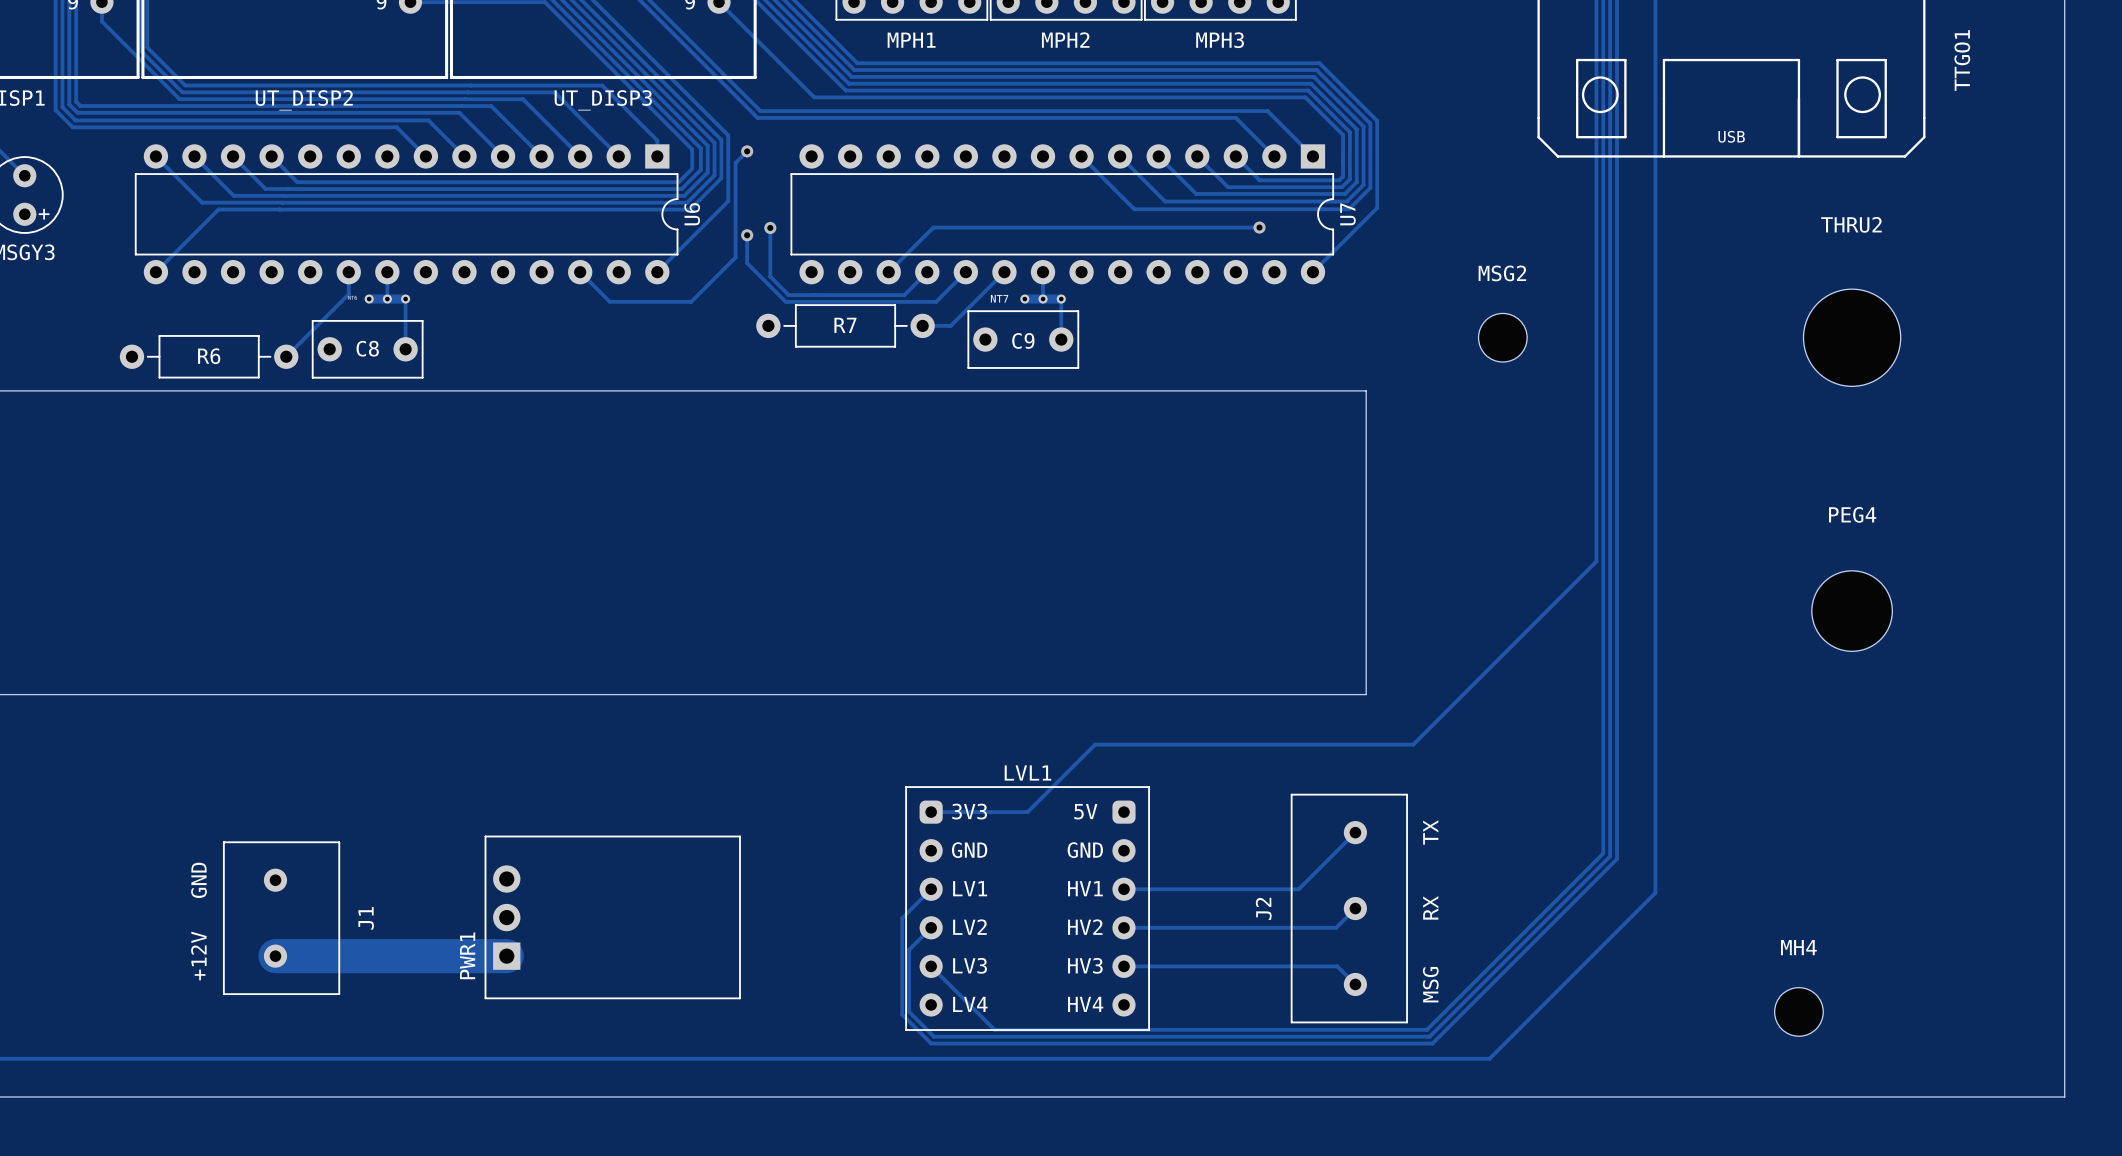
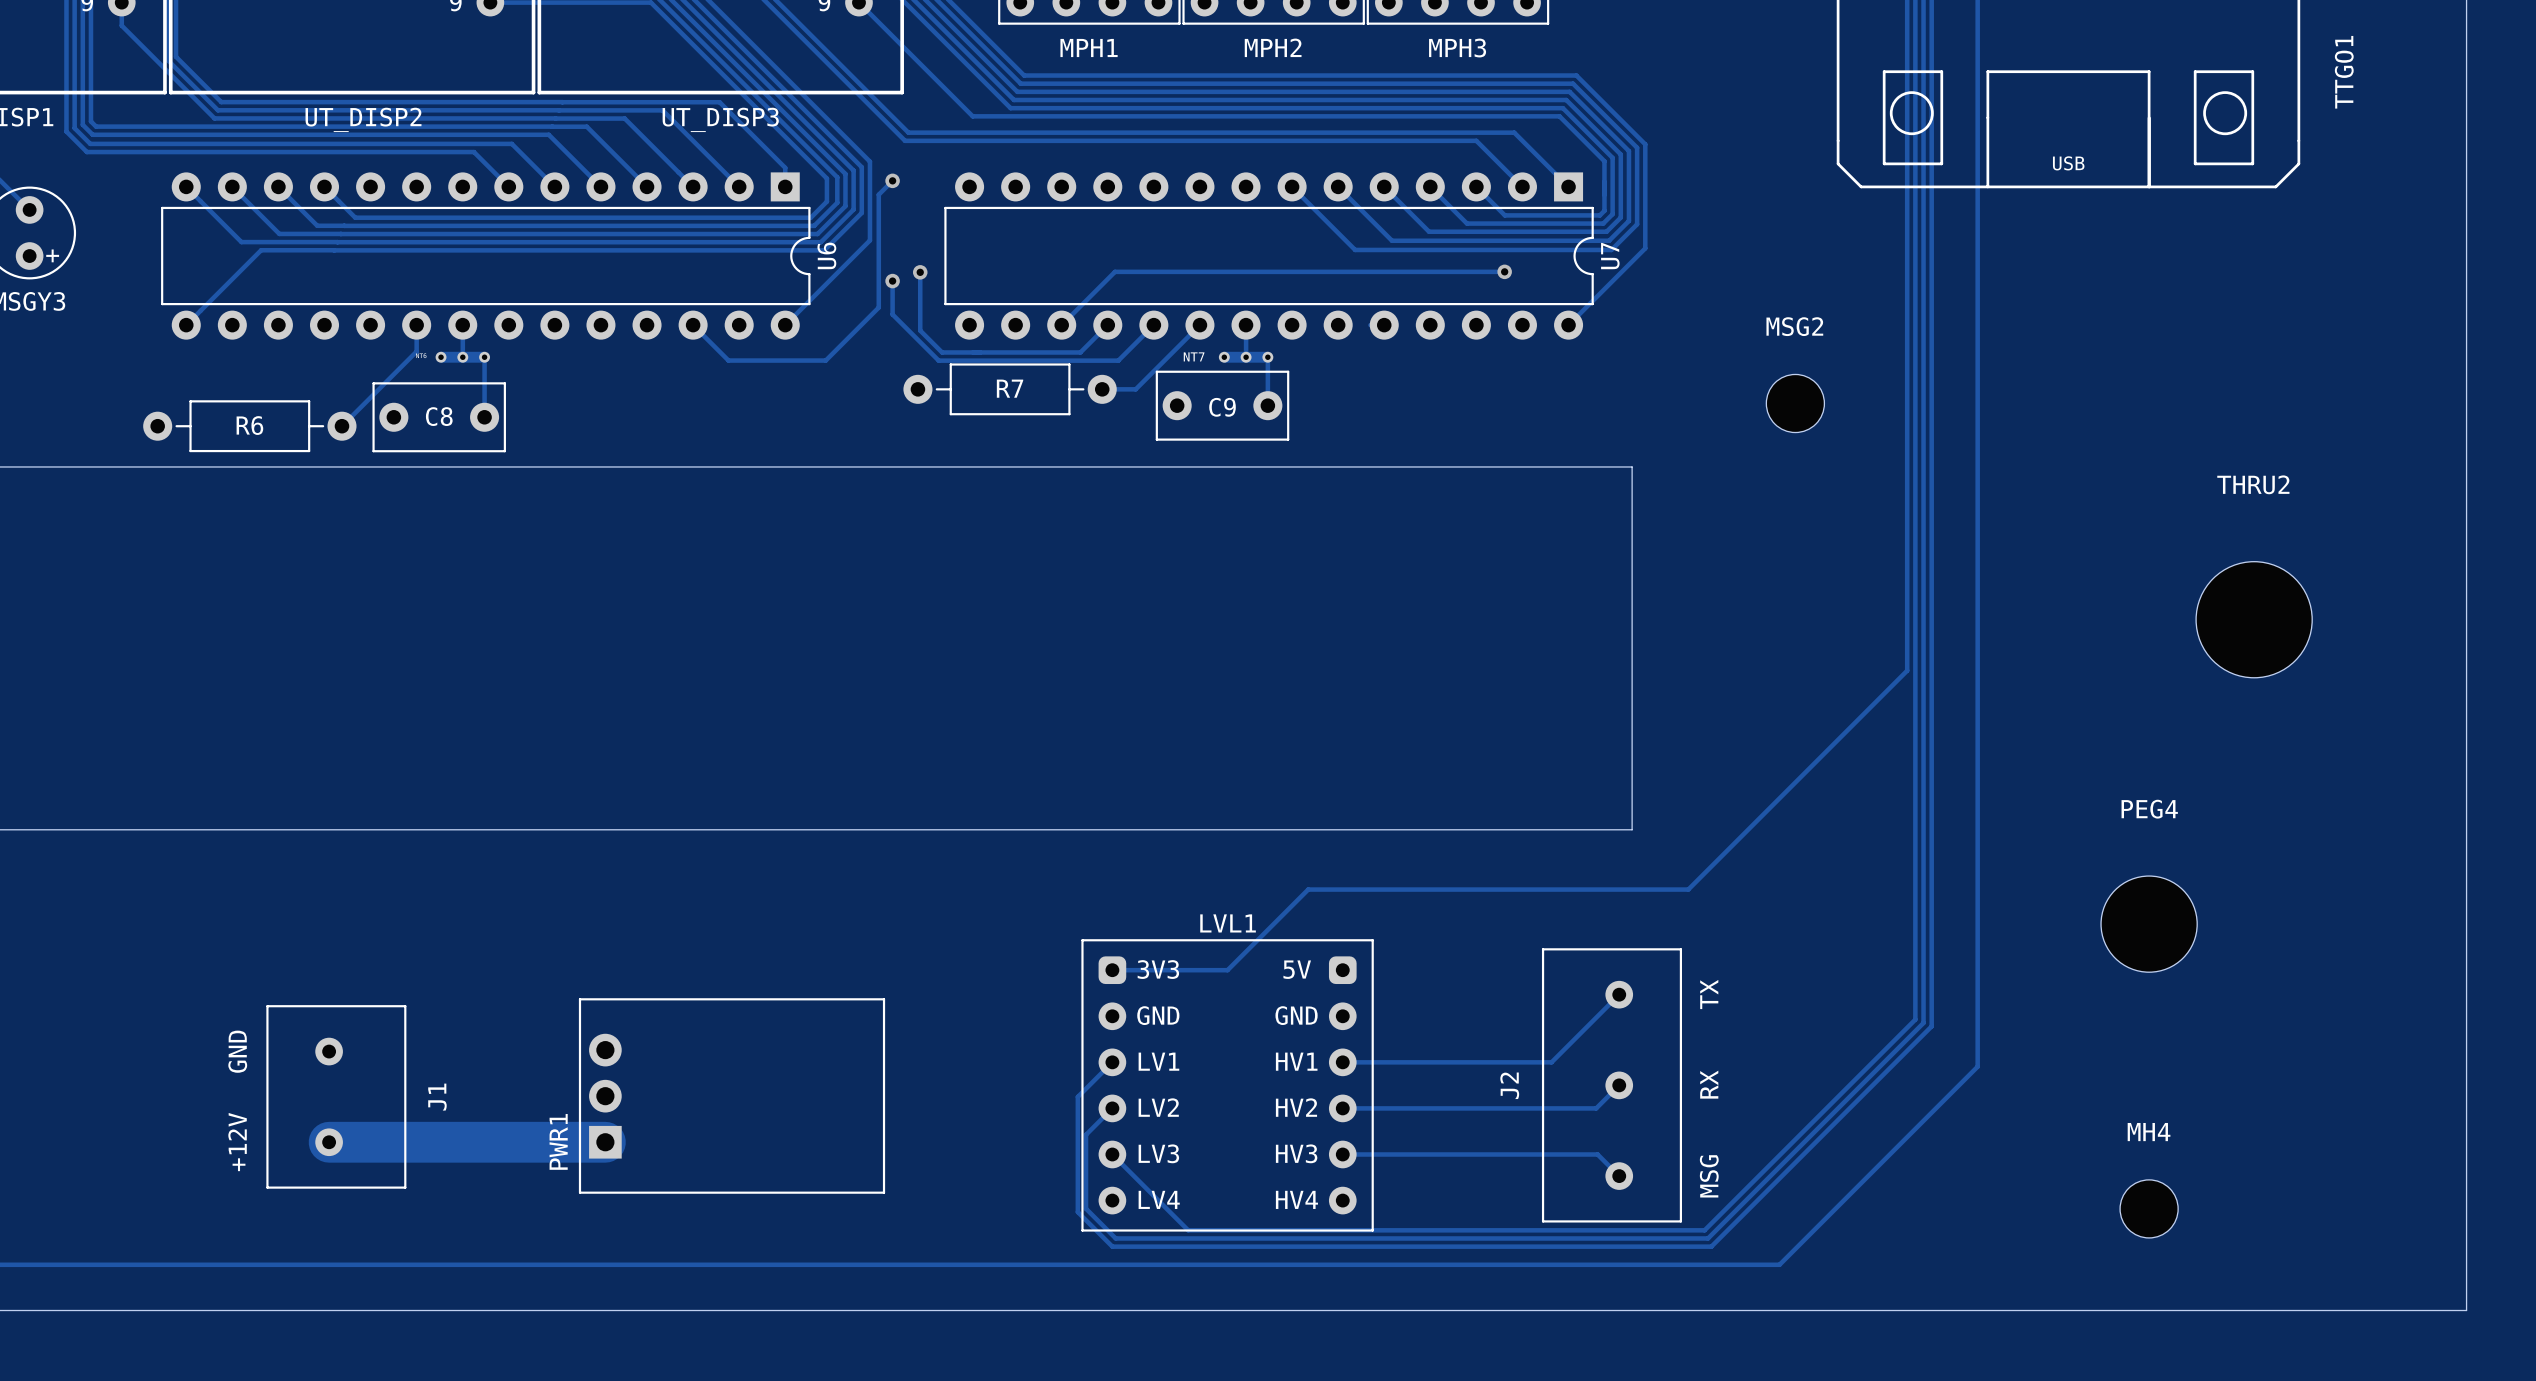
THRU2 position: (1852, 337) -> (2254, 619)
PEG4 position: (1852, 611) -> (2149, 924)

